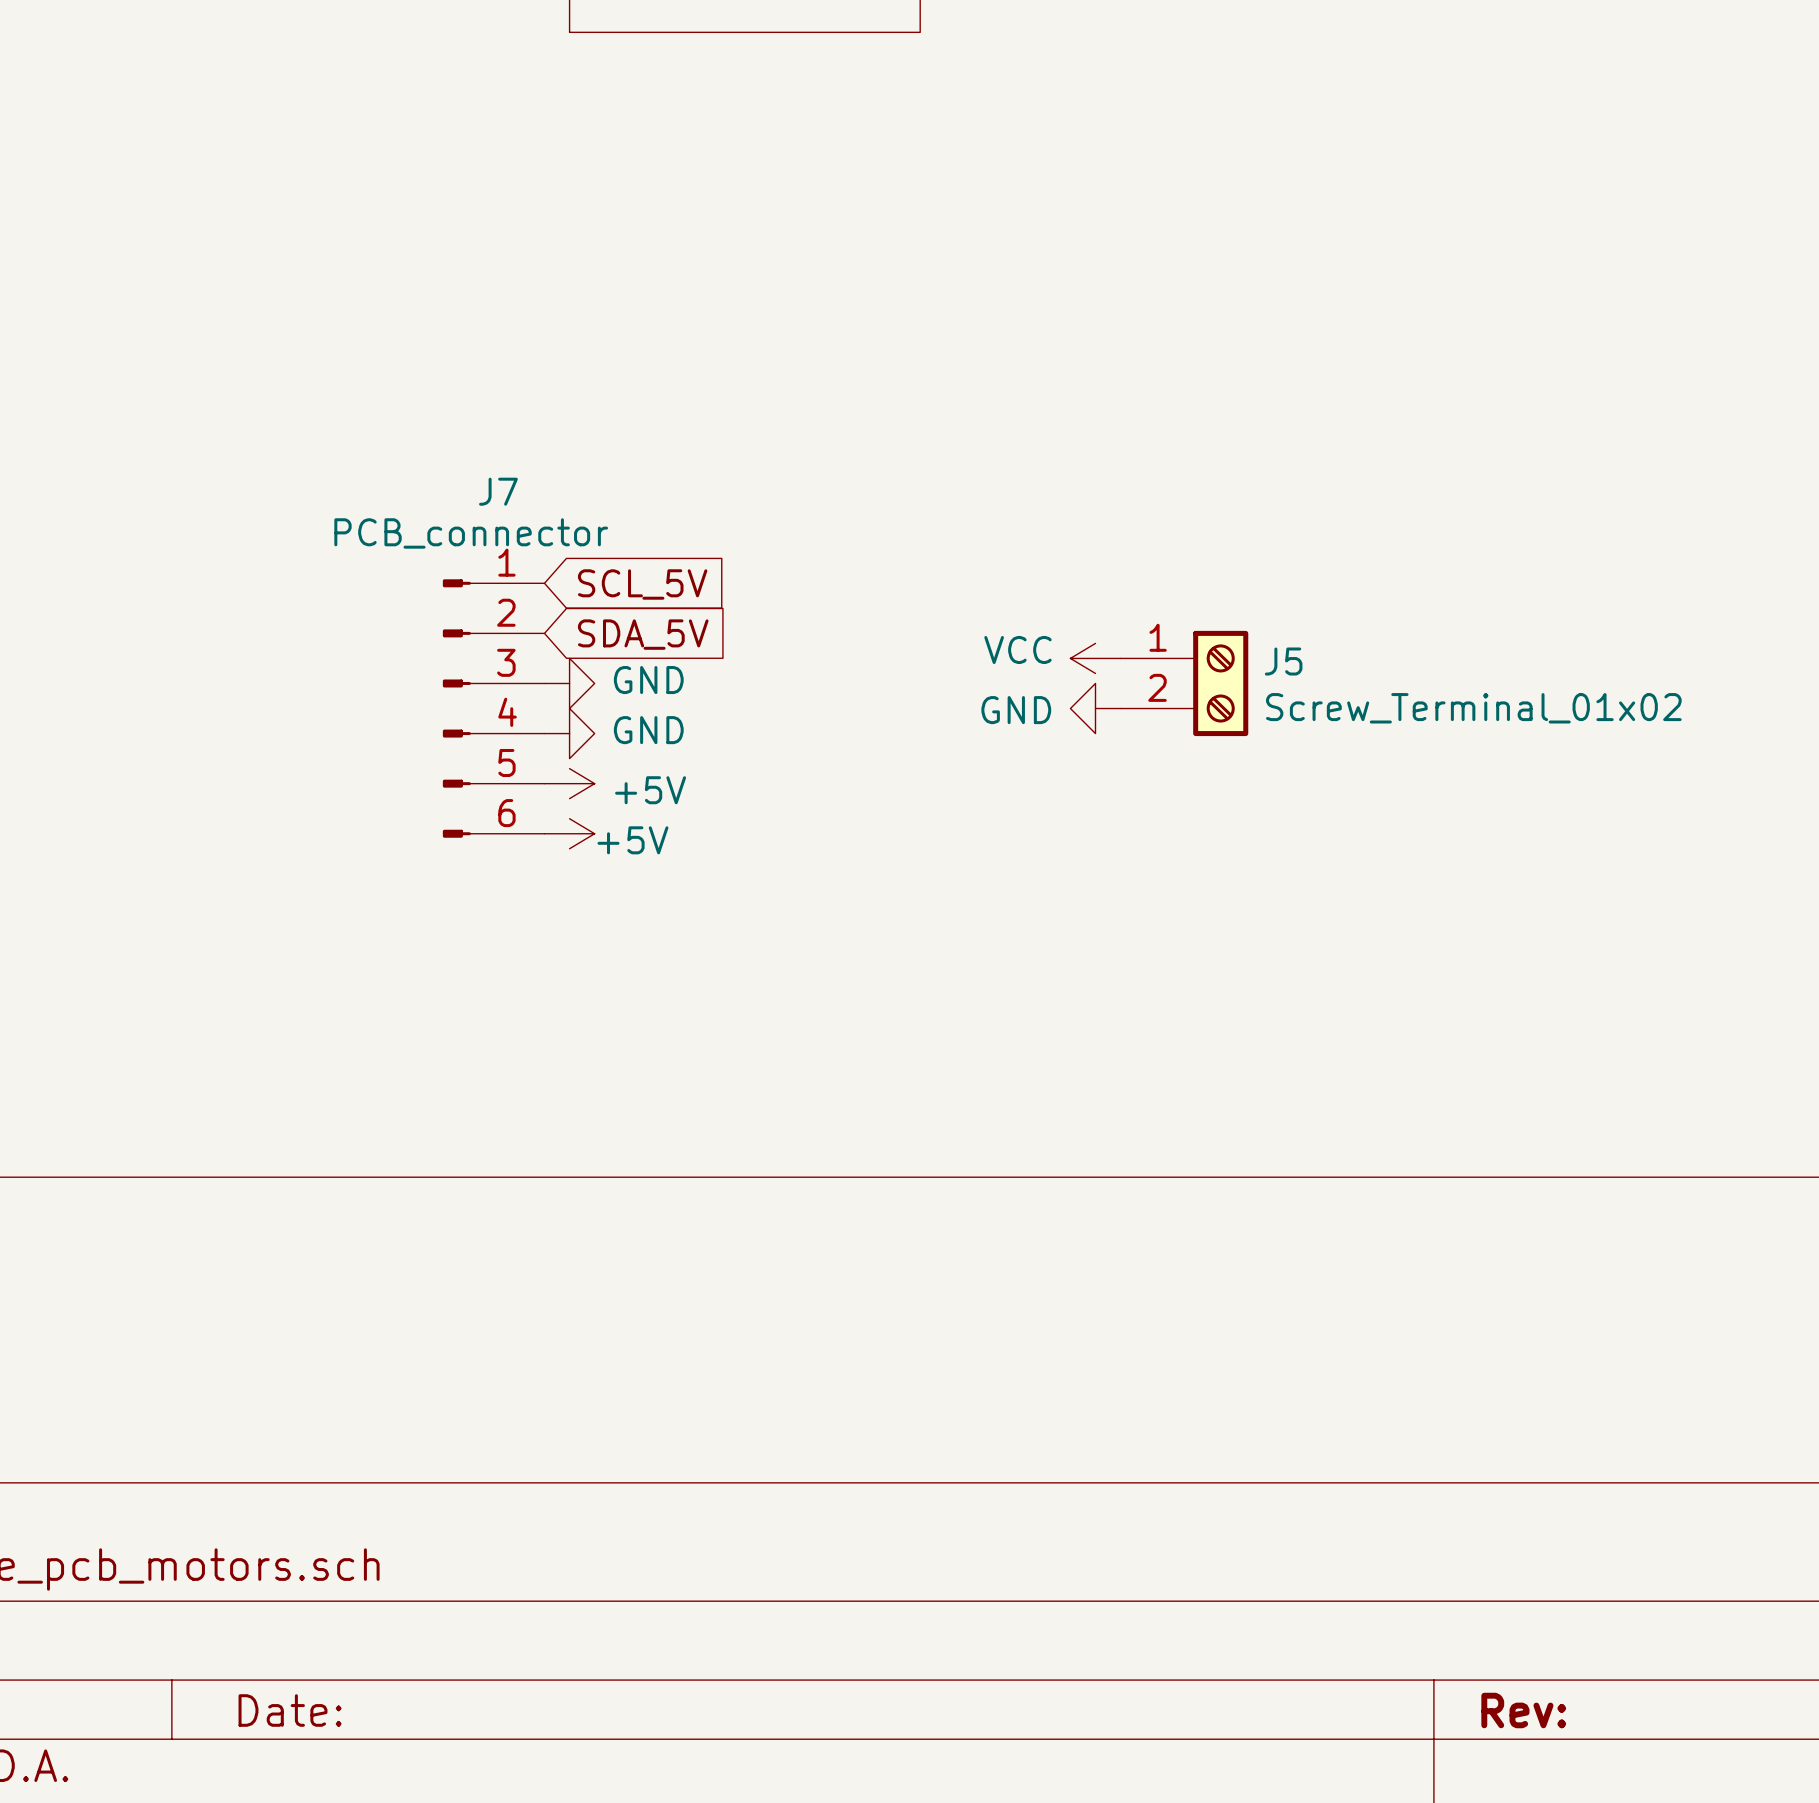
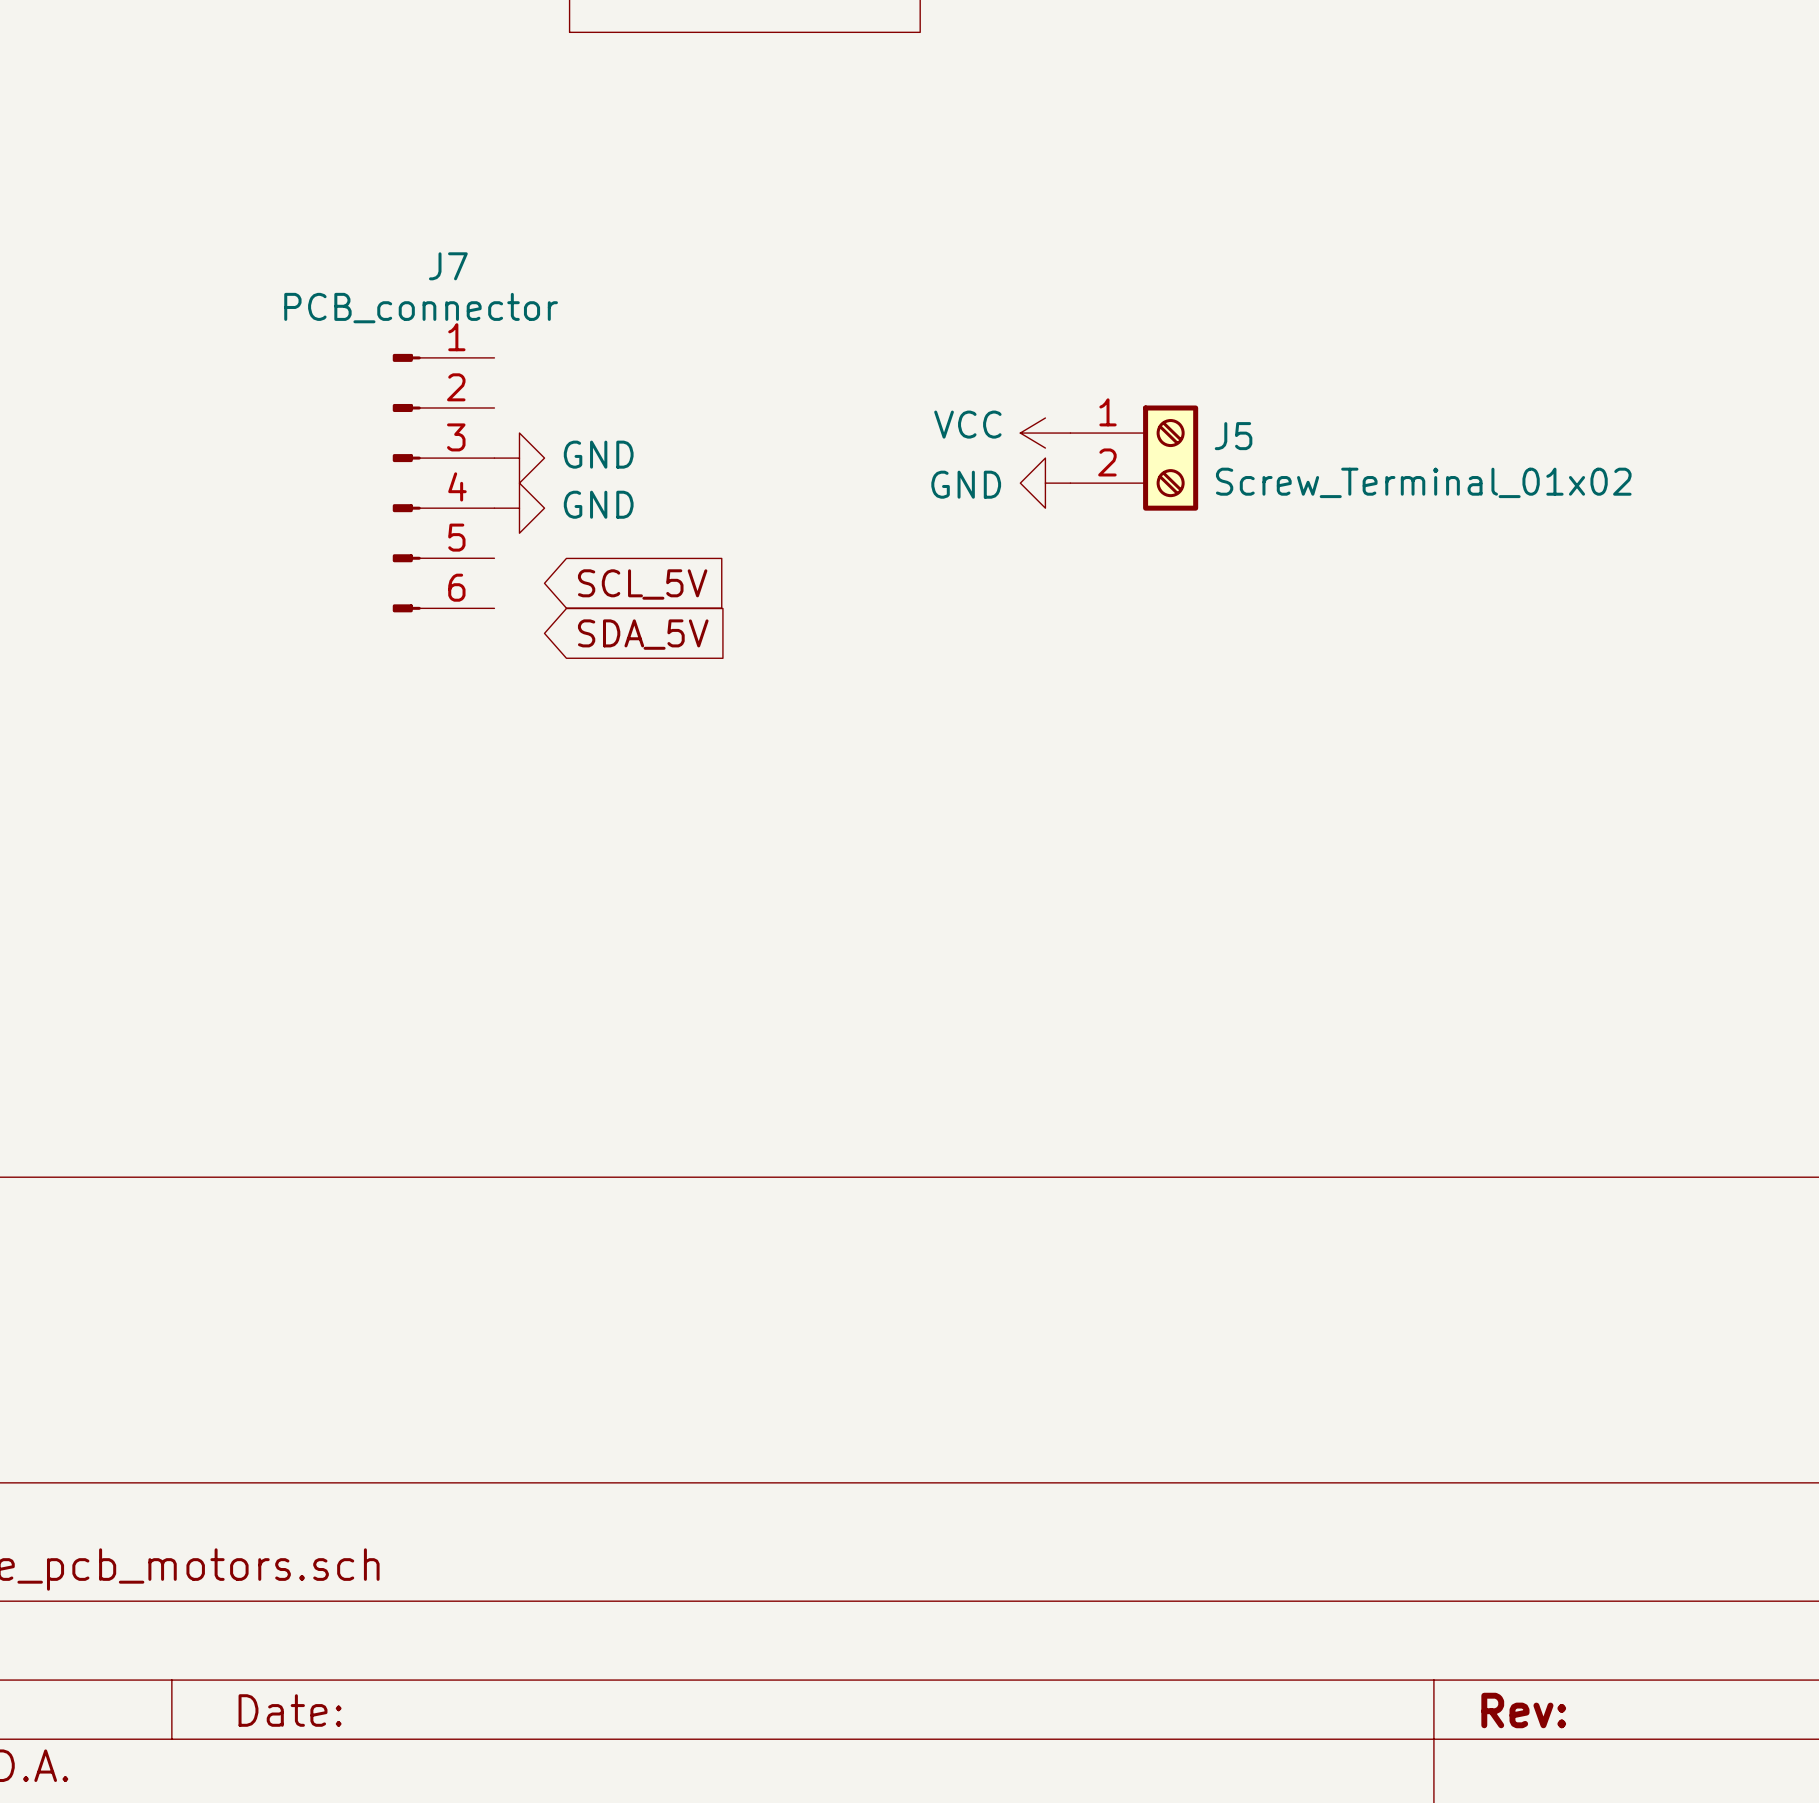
power symbol: none -> GND (519, 458)
power symbol: none -> GND (519, 508)
power symbol position: VCC (1095, 658) -> VCC (1045, 433)
power symbol: GND (569, 683) -> none
J5 position: (1184, 683) -> (1134, 458)
J7 position: (493, 708) -> (443, 483)
power symbol position: GND (1095, 708) -> GND (1045, 483)
power symbol: GND (569, 733) -> none
power symbol: +5V (569, 783) -> none
power symbol: +5V (569, 833) -> none

